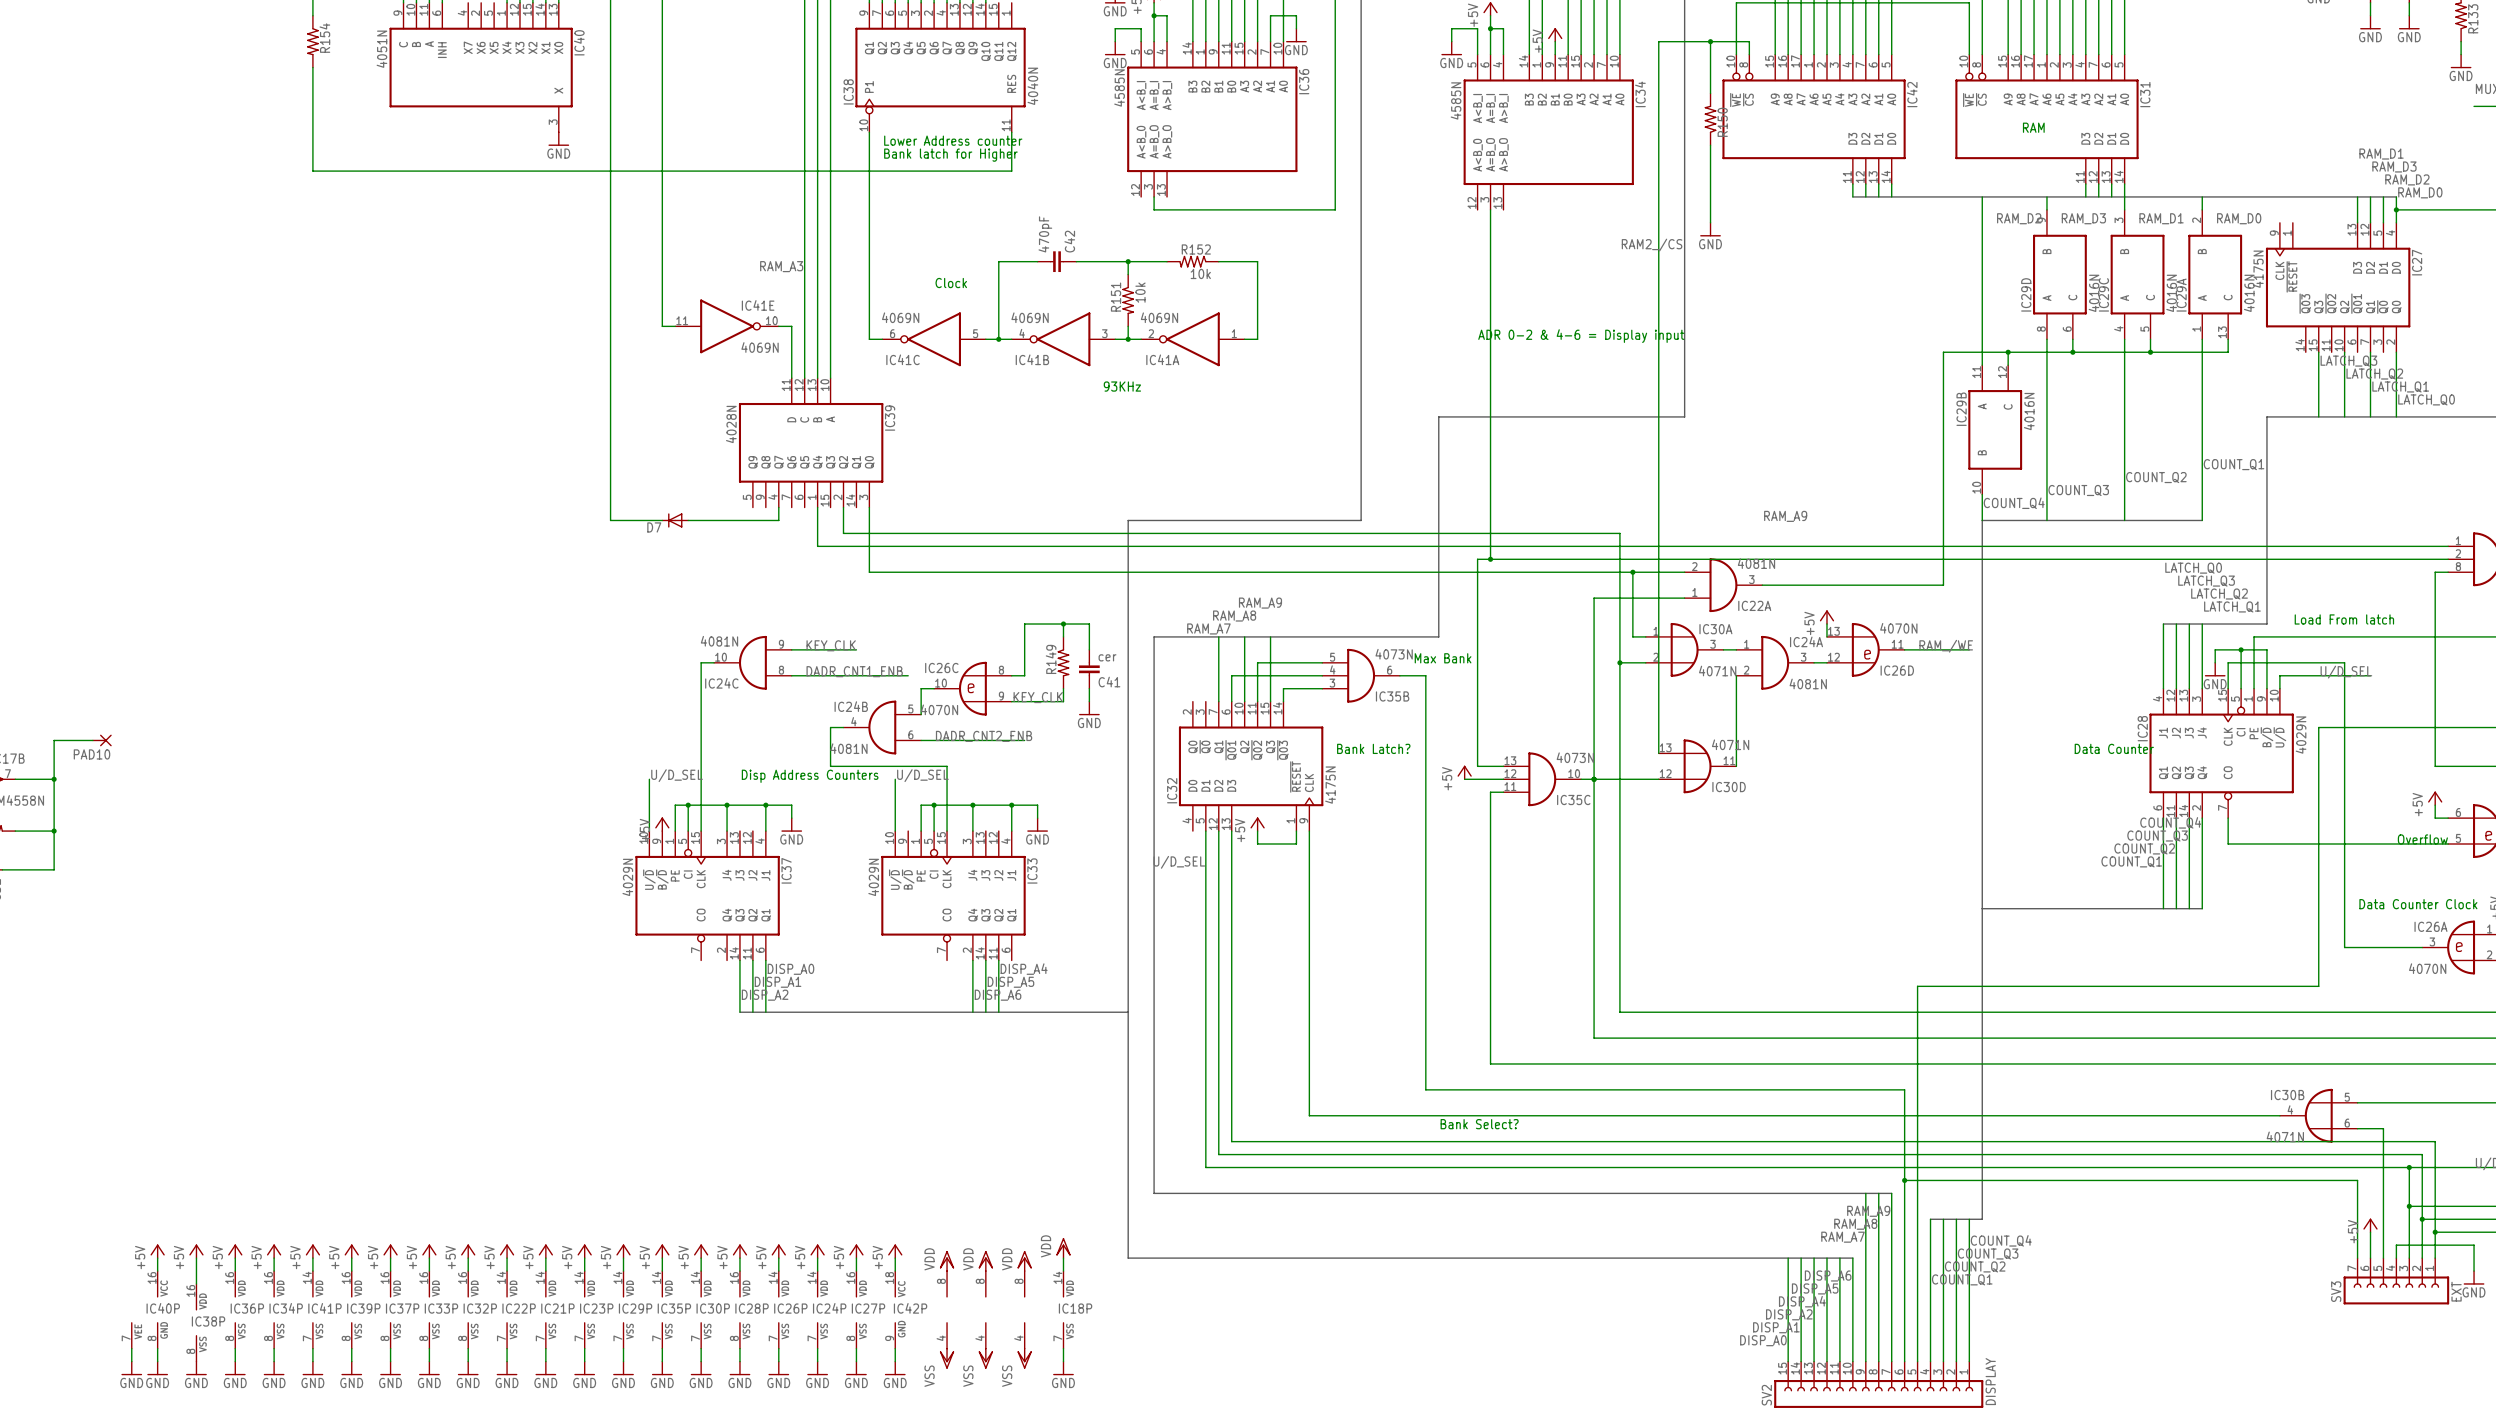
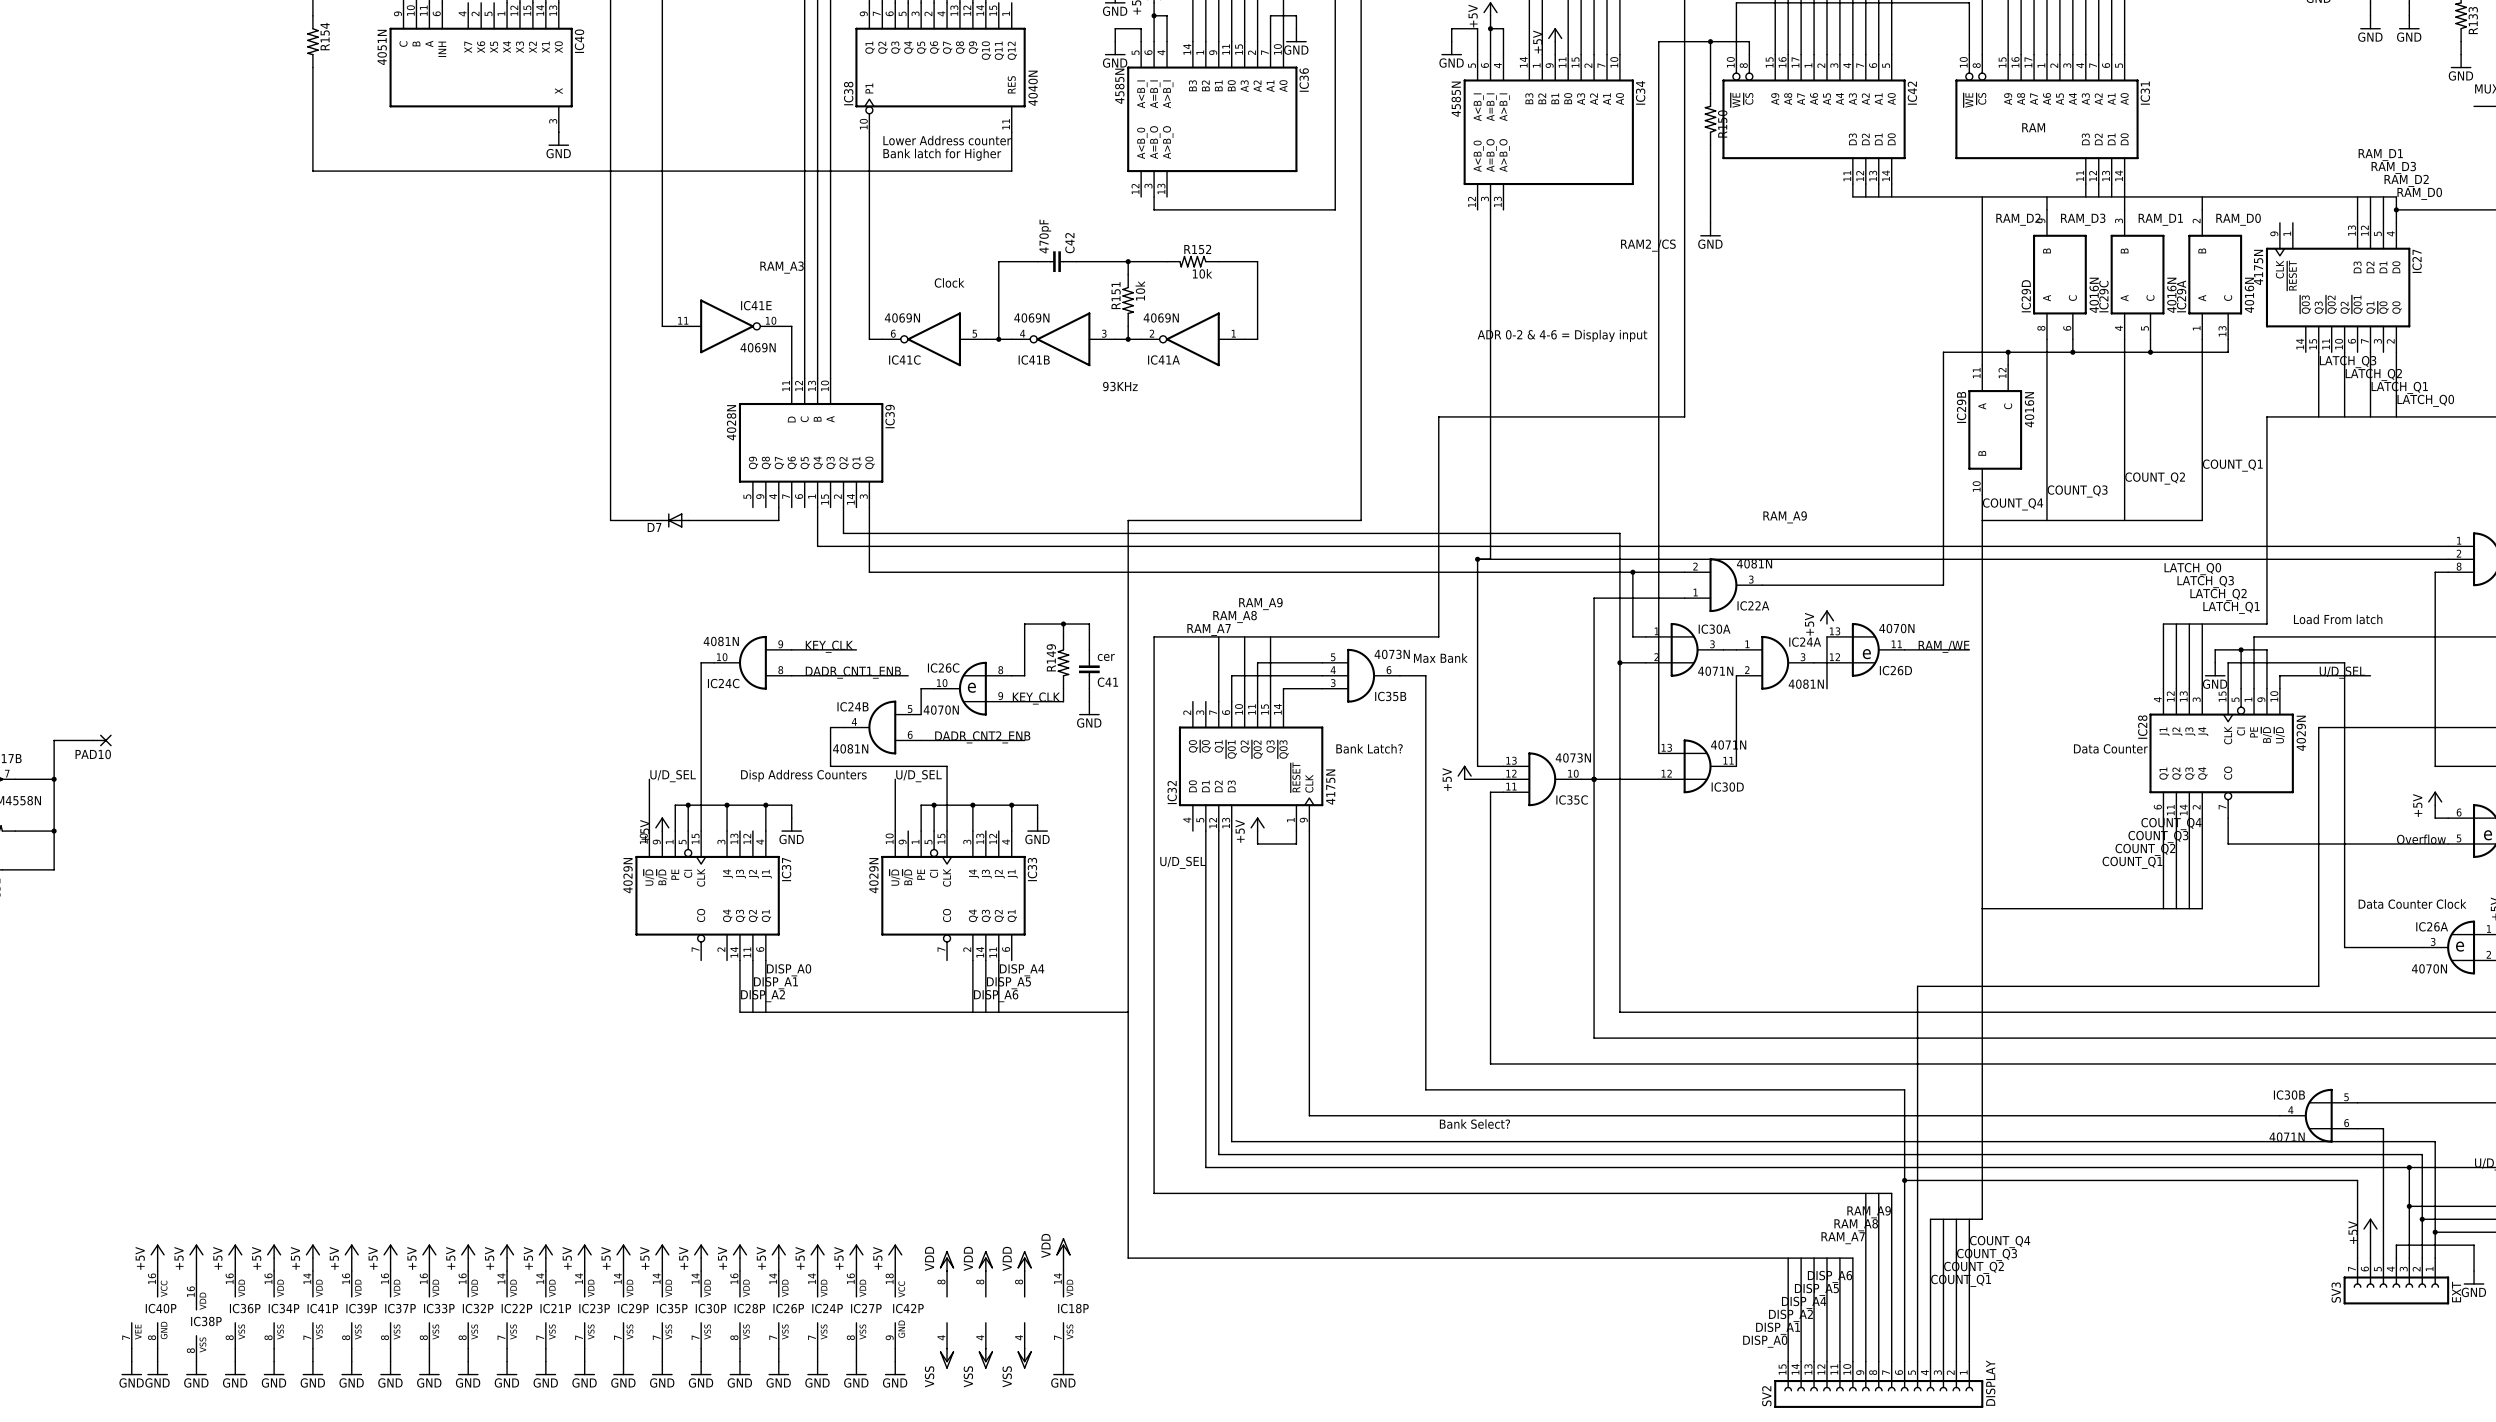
junction position: (1490, 559) -> (1477, 559)
wire: (1826, 624) (1826, 636) -> (1826, 688) (1826, 636)

